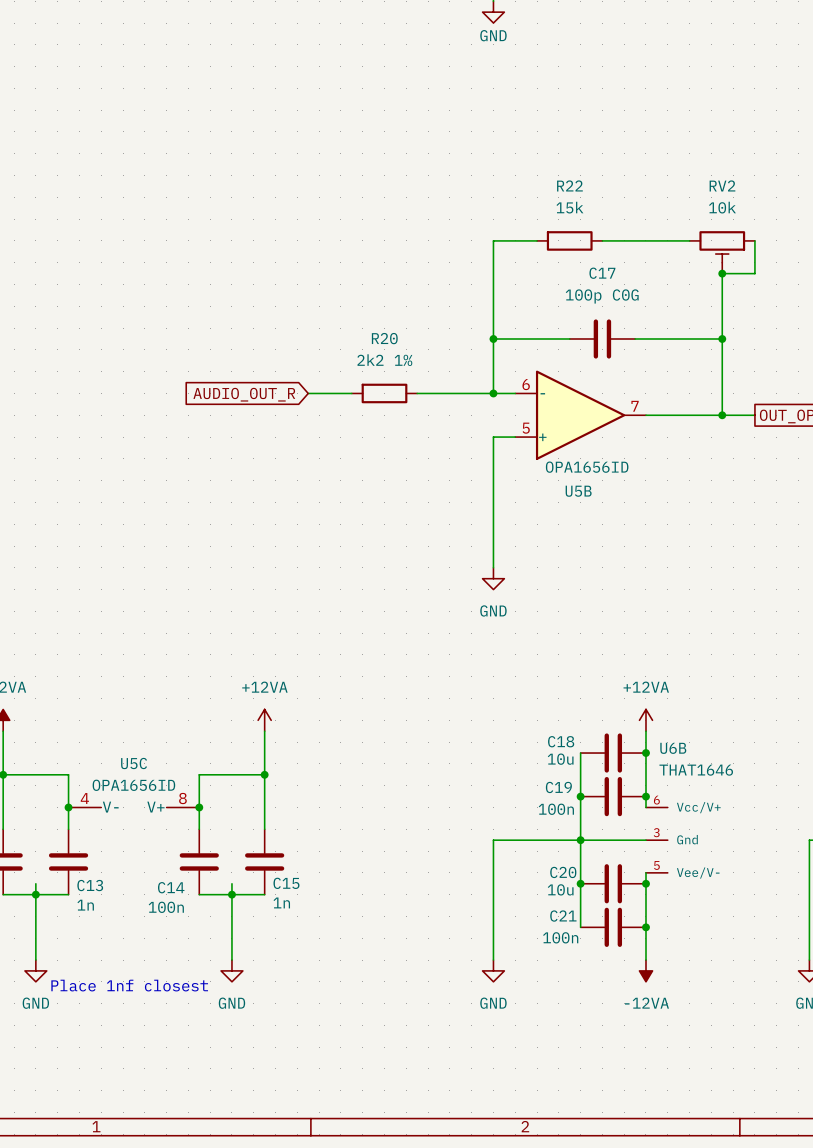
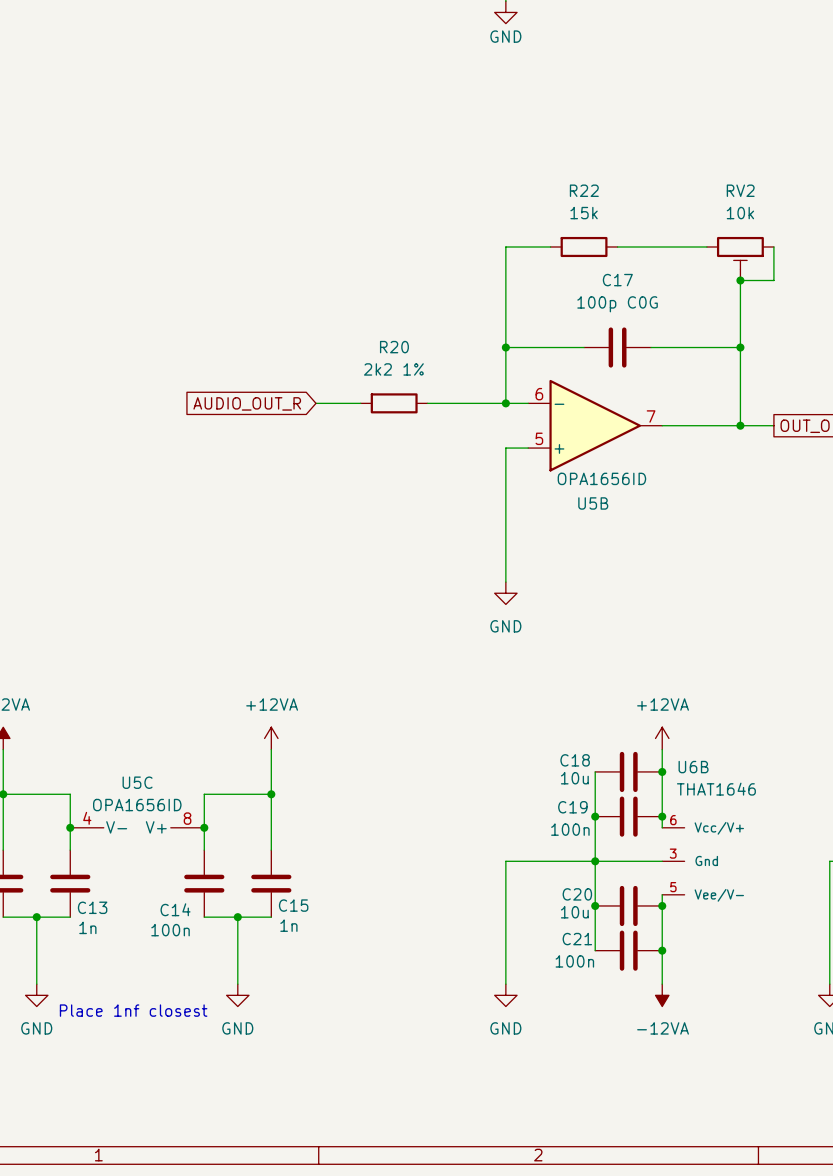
wire: (35, 883) (35, 894) -> none
wire: (231, 883) (231, 894) -> none

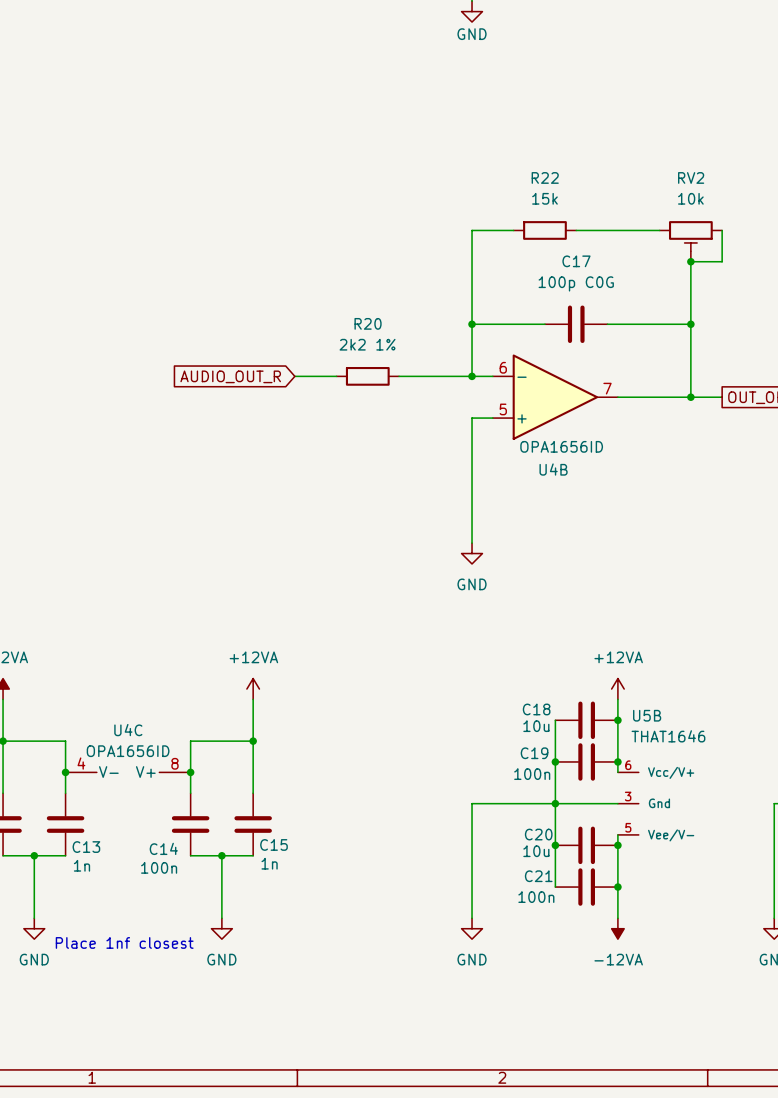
U5B name: U5B (593, 503) -> U4B (553, 469)
U6B name: U6B (693, 767) -> U5B (647, 715)
U5C name: U5C (137, 782) -> U4C (128, 730)

